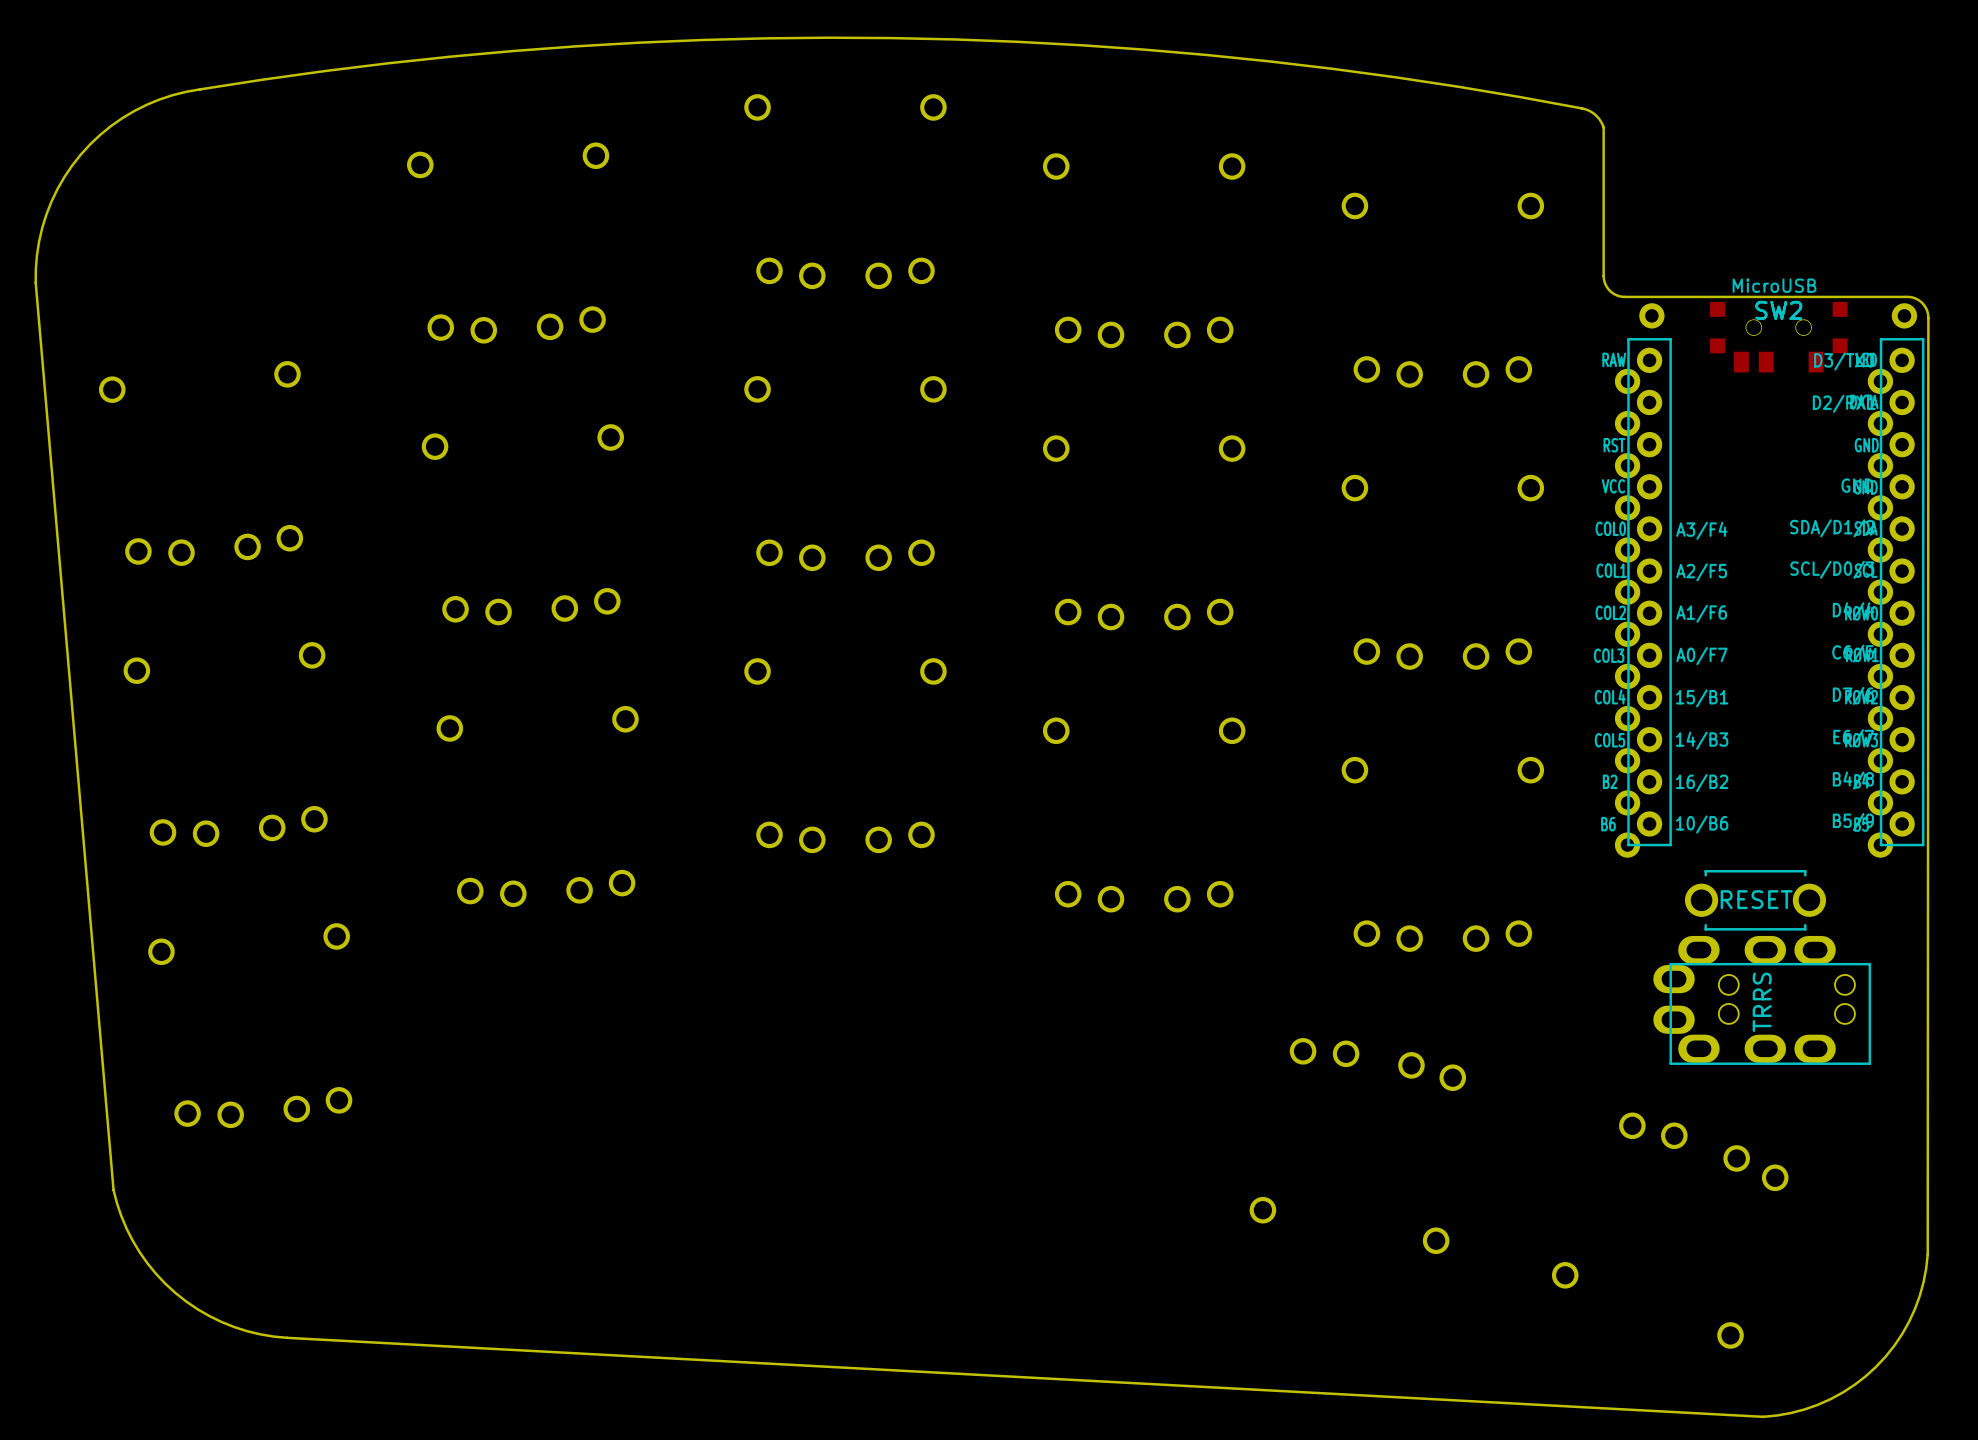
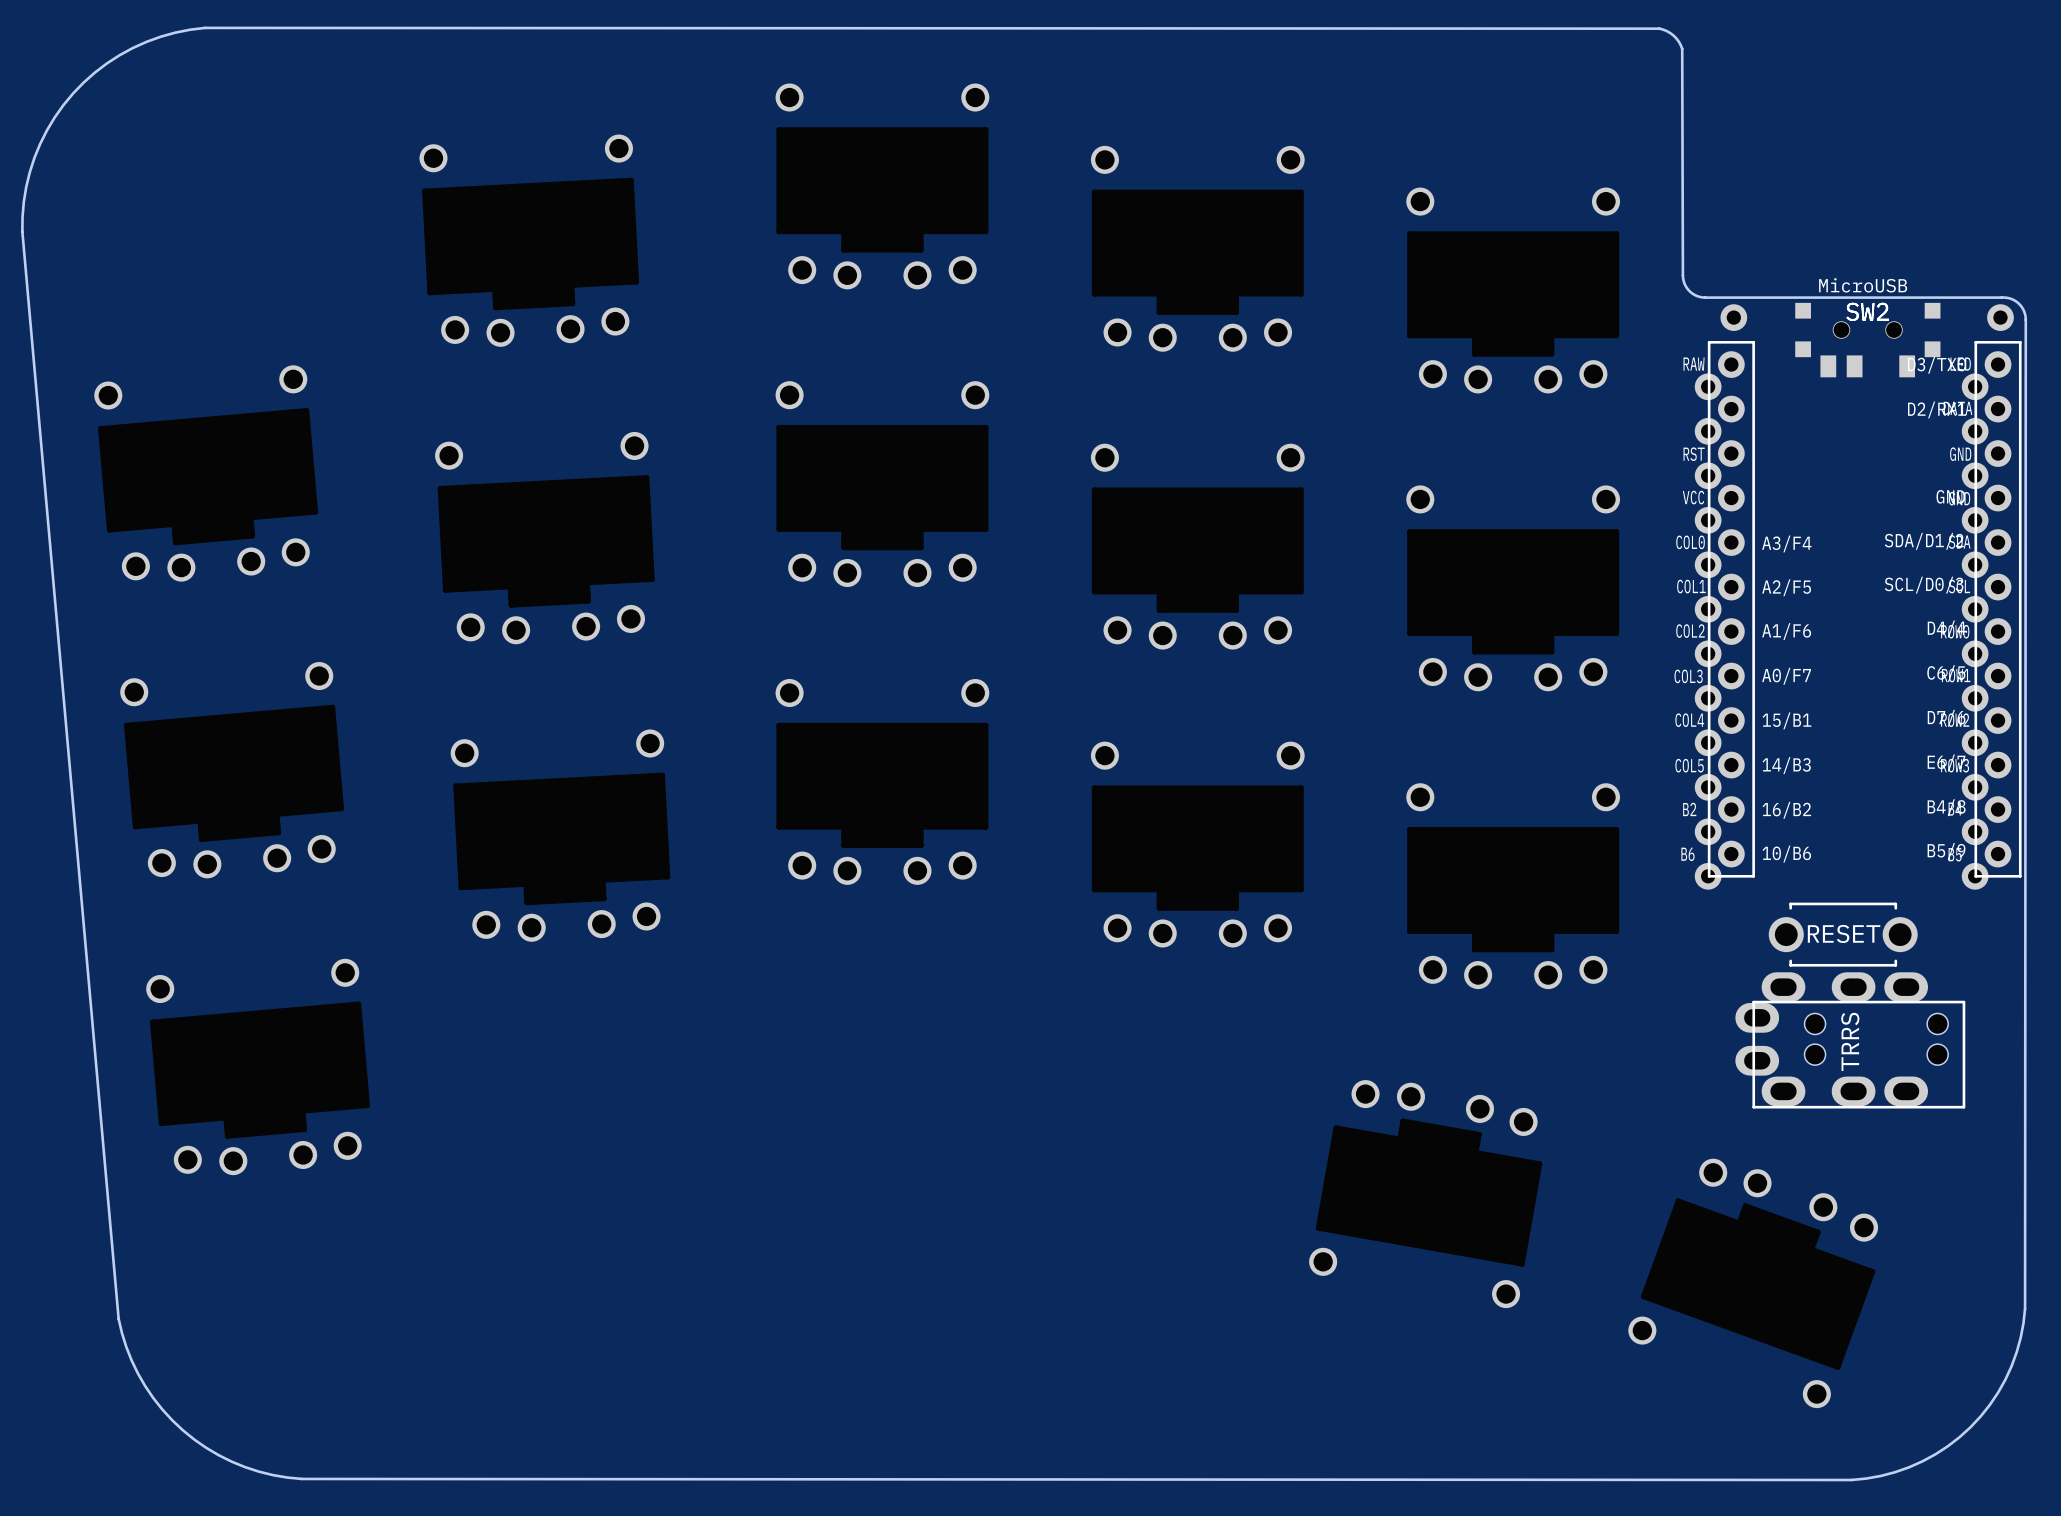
board edge: (1603, 275) (1603, 127) (1593, 113) (1582, 108) (1457, 86) (1269, 61) (1081, 45) (954, 39) (828, 37) (639, 42) (450, 56) (262, 79) (172, 95) (146, 104) (122, 118) (100, 134) (80, 154) (57, 189) (46, 214) (39, 241) (35, 282) (113, 1190) (121, 1216) (132, 1240) (147, 1263) (165, 1283) (186, 1301) (209, 1315) (246, 1331) (273, 1336) (1763, 1416) -> (1682, 275) (1682, 48) (1673, 35) (1659, 28) (205, 27) (175, 32) (146, 41) (106, 63) (83, 82) (63, 105) (40, 143) (26, 186) (22, 231) (118, 1318) (126, 1347) (138, 1373) (153, 1398) (182, 1430) (206, 1447) (231, 1461) (273, 1475) (302, 1478) (1851, 1480)

